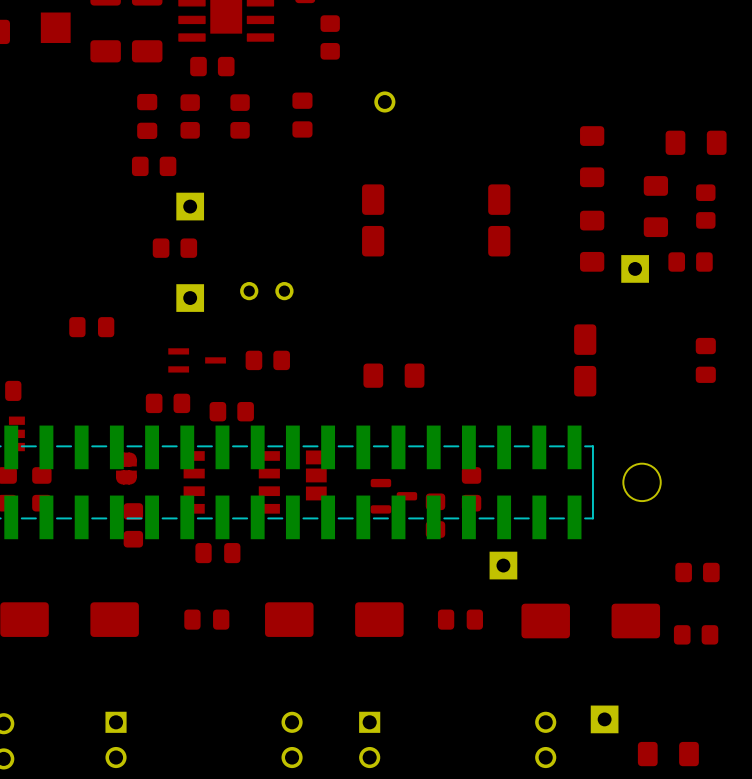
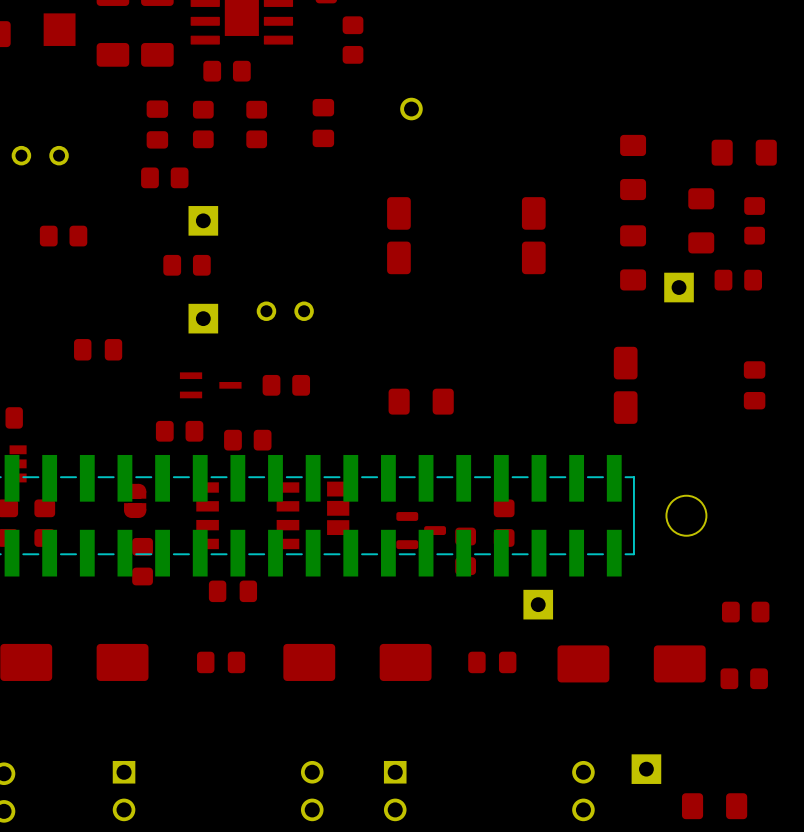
part: none -> (40, 155)
part: none -> (63, 236)

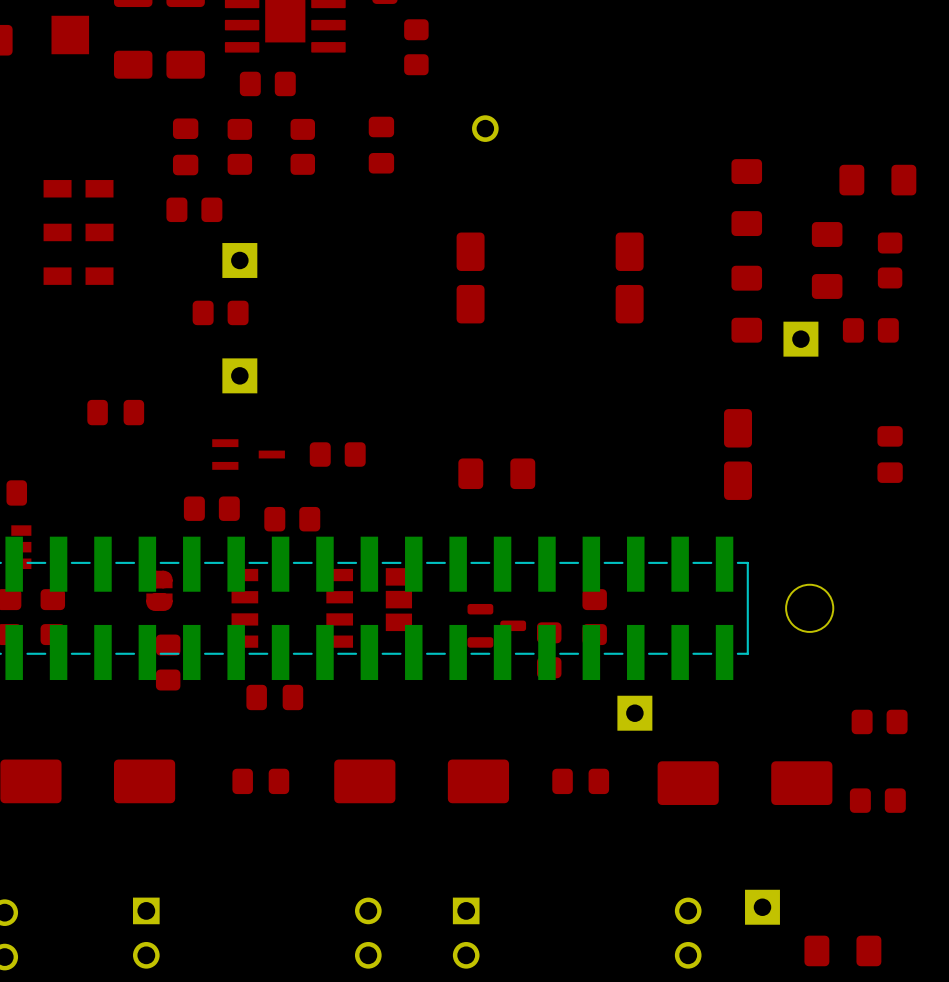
part: (40, 155) -> none
part: none -> (78, 232)
part: (63, 236) -> none
part: (285, 311) -> none

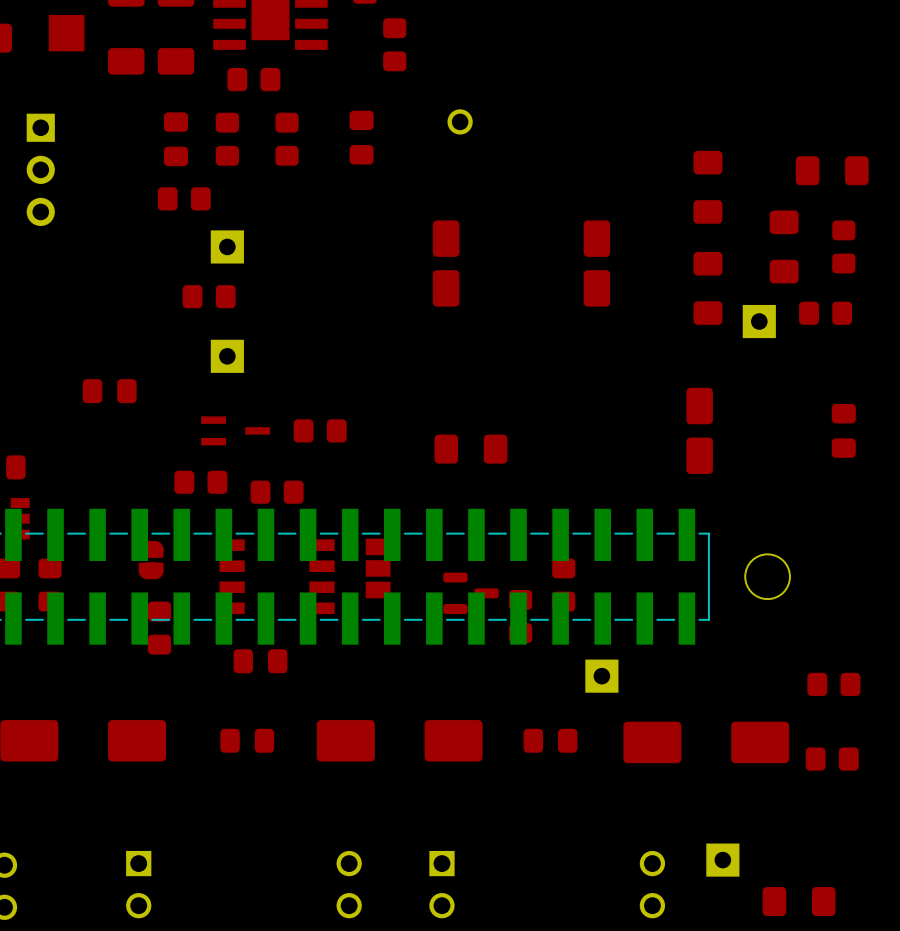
part: none -> (40, 169)
part: (78, 232) -> none

